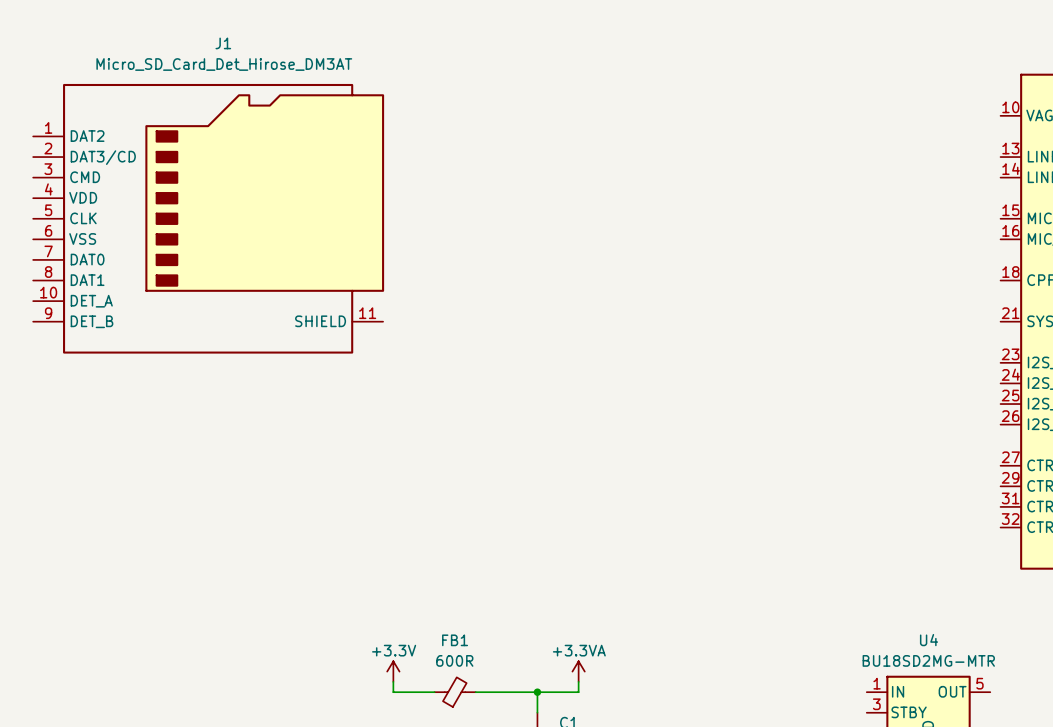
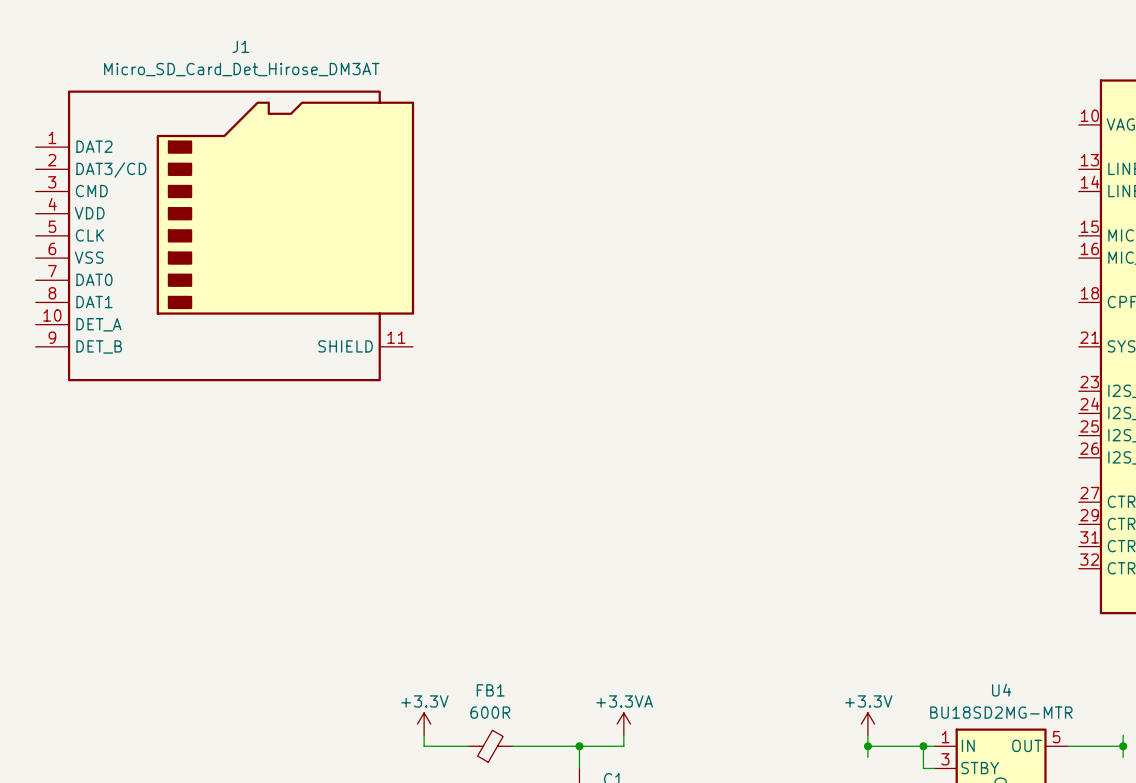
power symbol: none -> +3.3V (867, 724)
wire: none -> (867, 735) (867, 757)
wire: none -> (1123, 735) (1123, 757)
wire: none -> (867, 746) (934, 746)
junction: none -> (867, 746)
wire: none -> (923, 746) (923, 768) (934, 768)
junction: none -> (923, 746)
wire: none -> (1067, 746) (1123, 746)
junction: none -> (1123, 746)

